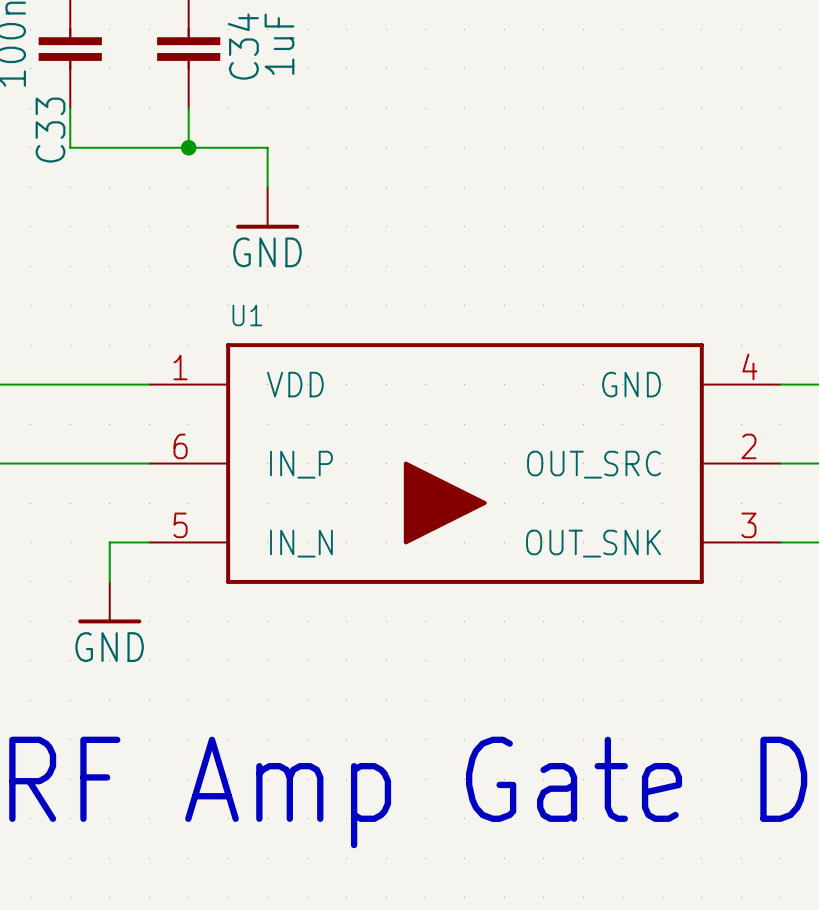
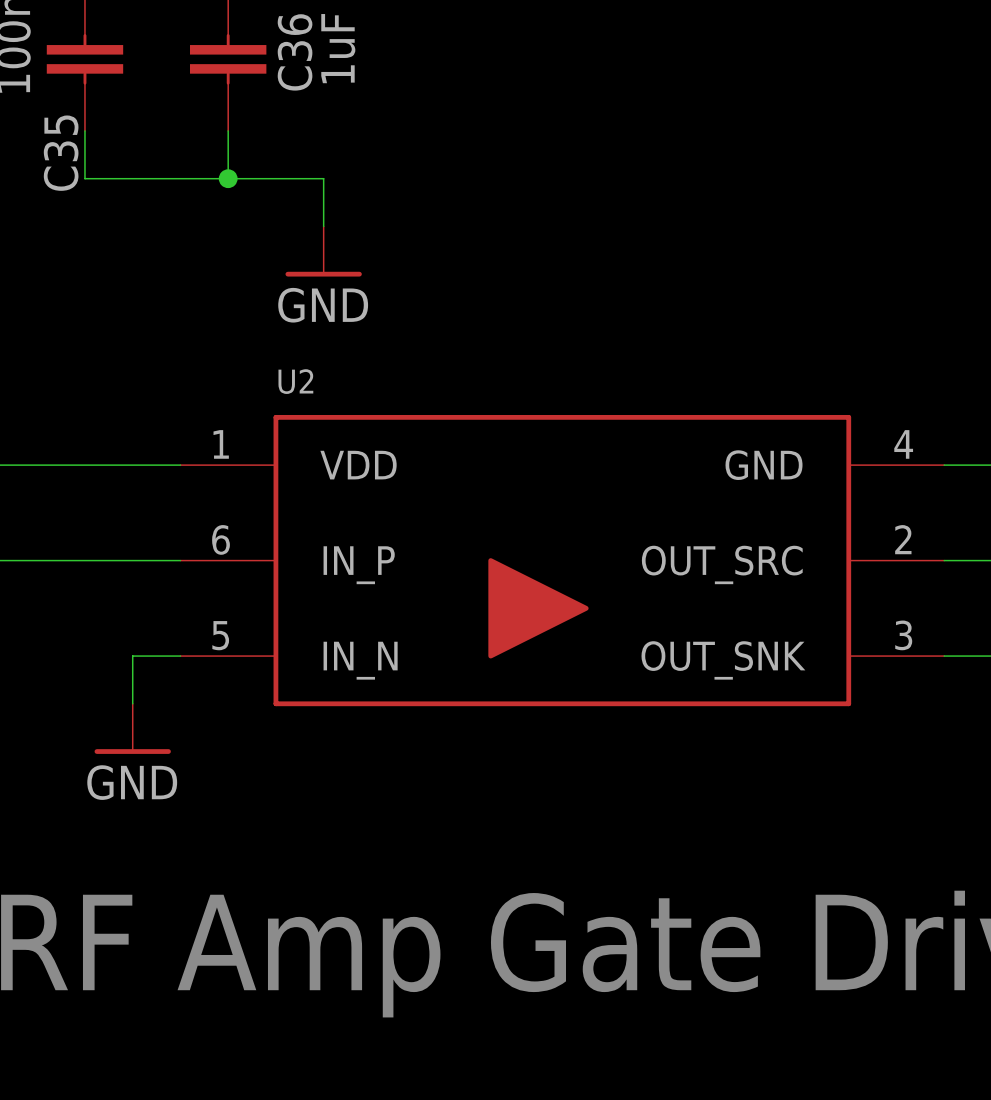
C34 name: C34 (243, 46) -> C36 (295, 52)
C33 name: C33 (50, 130) -> C35 (61, 153)
U1 name: U1 (247, 315) -> U2 (295, 381)

